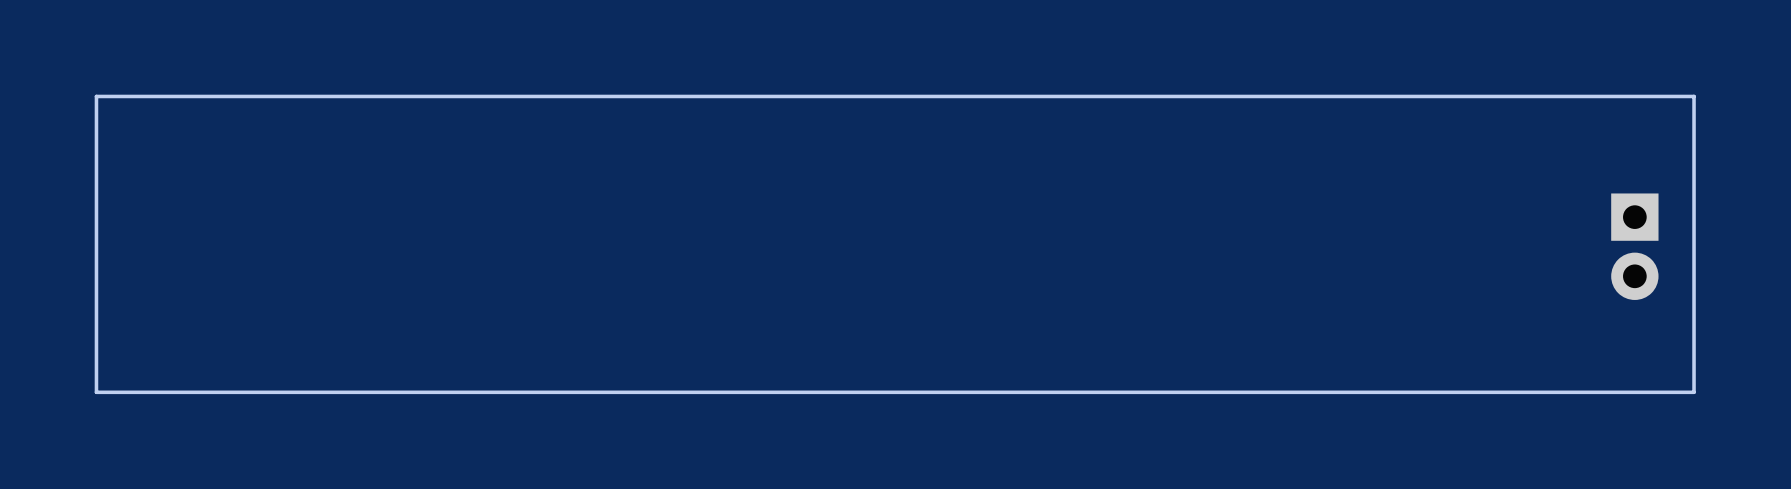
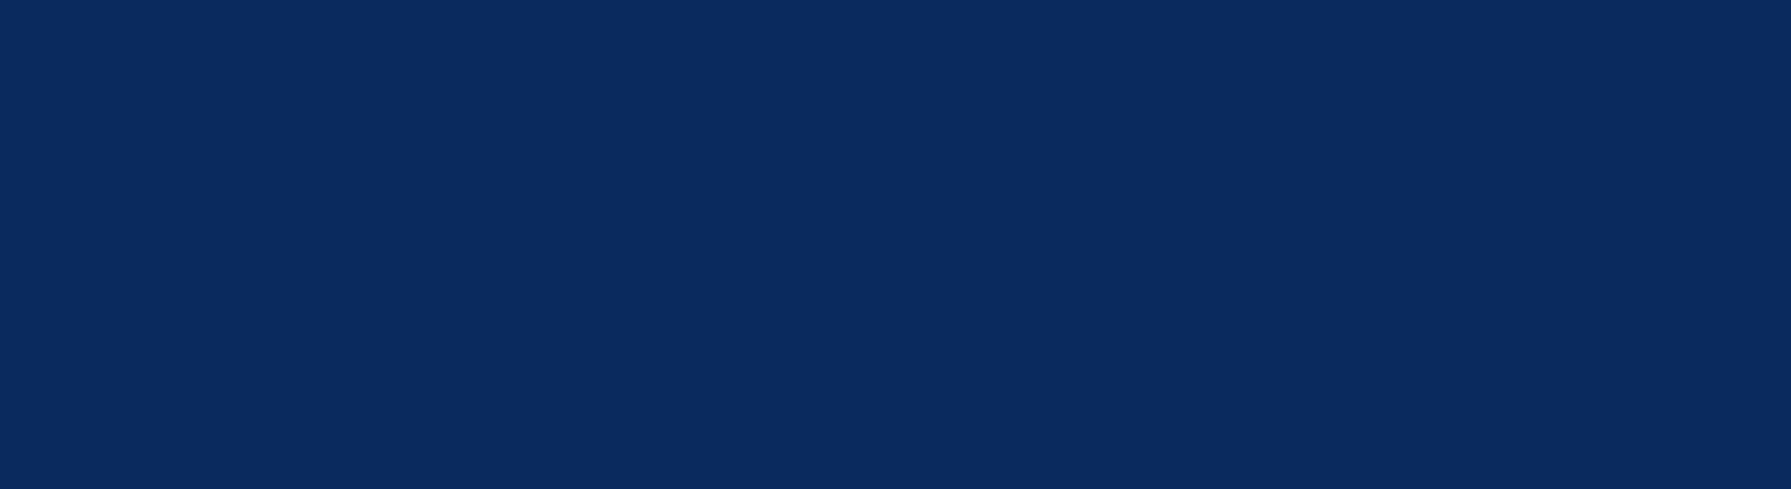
board edge: (1694, 96) (1694, 392) (96, 392) (96, 96) (1694, 96) -> none
part: (1634, 246) -> none

